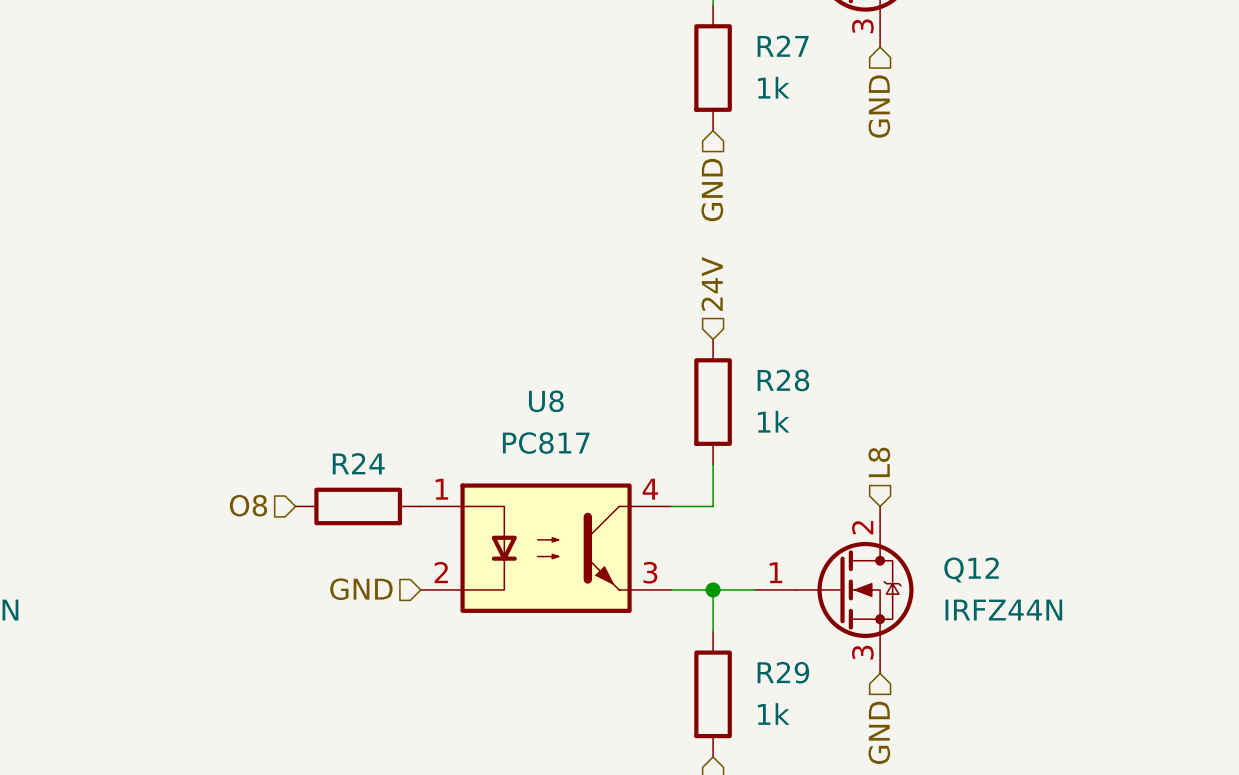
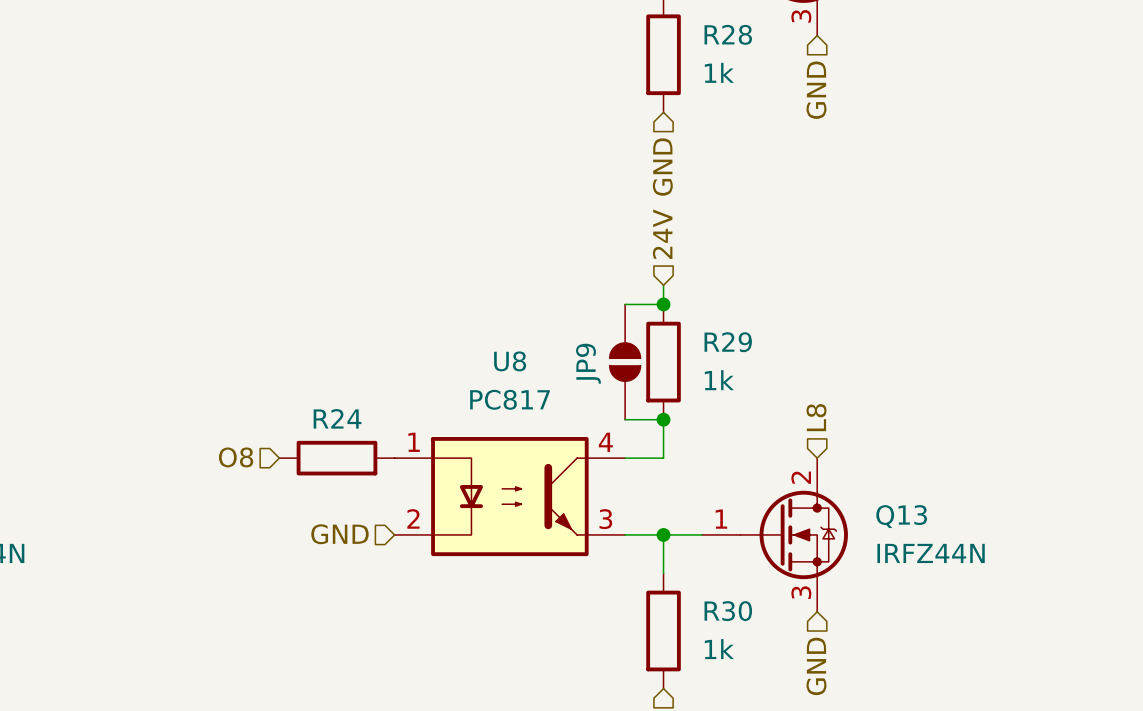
R27 name: R27 (783, 46) -> R28 (728, 34)
hierarchical label position: 24V (712, 283) -> 24V (662, 234)
wire: none -> (663, 285) (663, 304) (625, 304)
junction: none -> (663, 304)
R28 name: R28 (783, 380) -> R29 (728, 342)
JP9: none -> (625, 362)
wire: none -> (625, 419) (663, 419)
junction: none -> (663, 419)
Q12 name: Q12 (971, 569) -> Q13 (901, 516)
R29 name: R29 (783, 672) -> R30 (728, 611)

